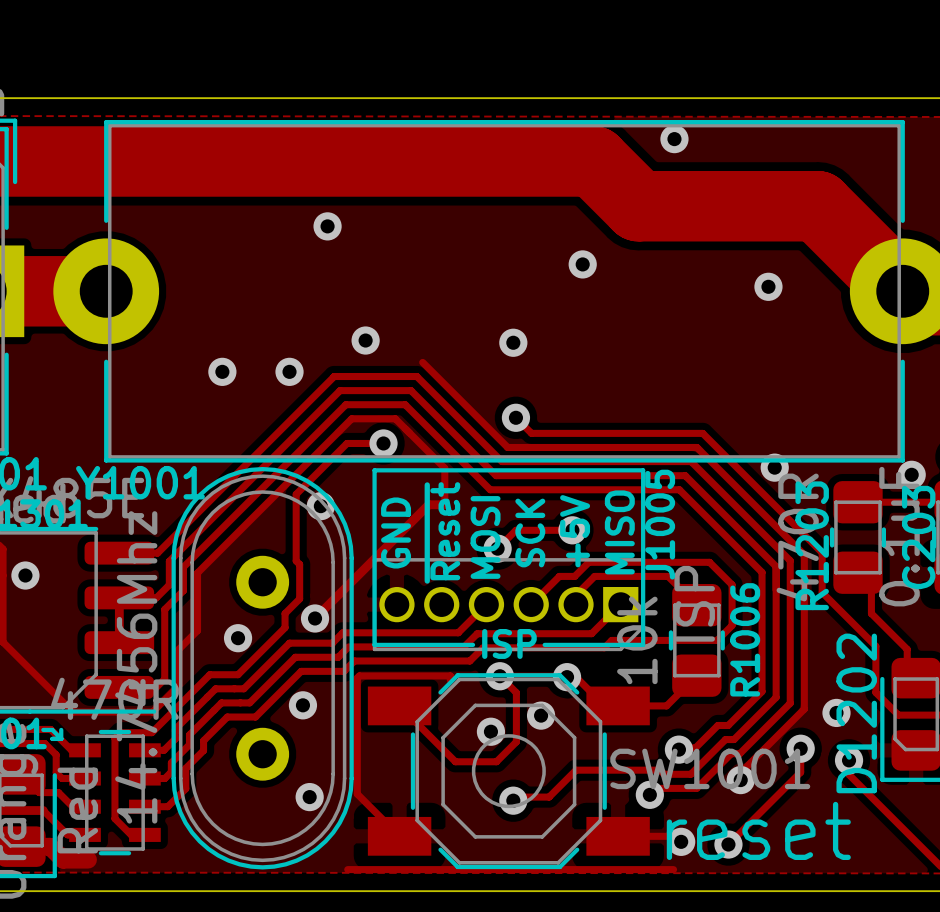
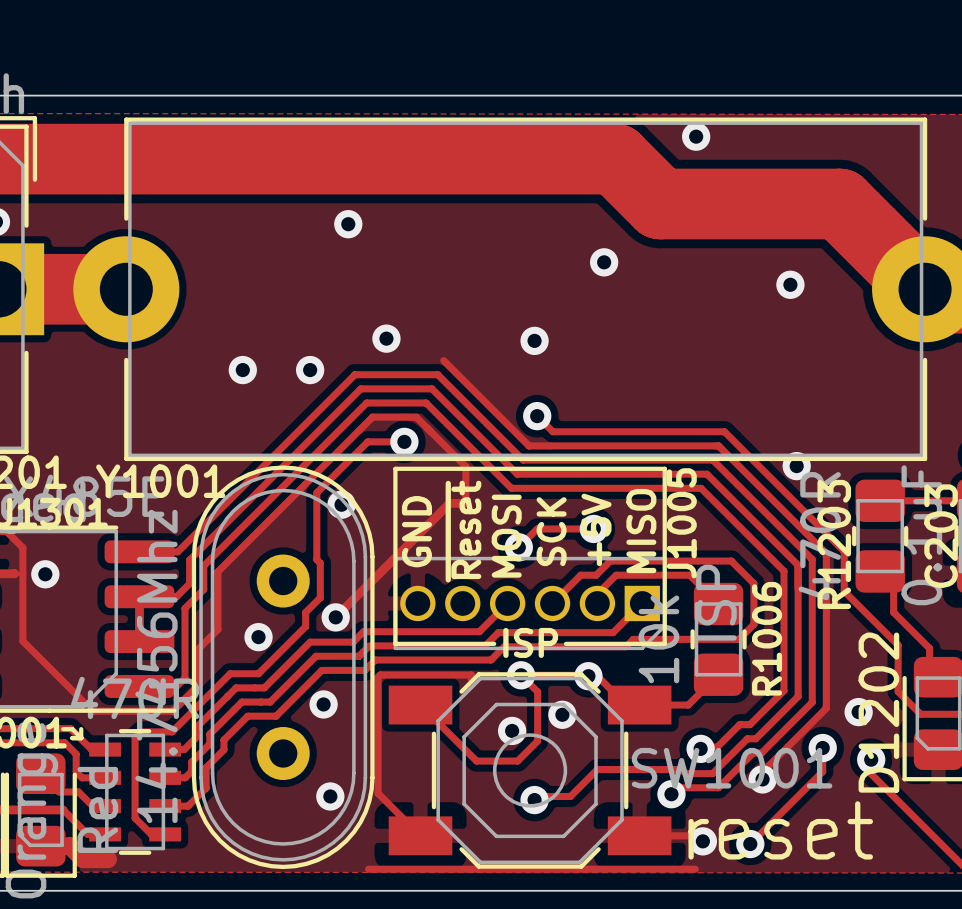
via: (911, 474) -> none

